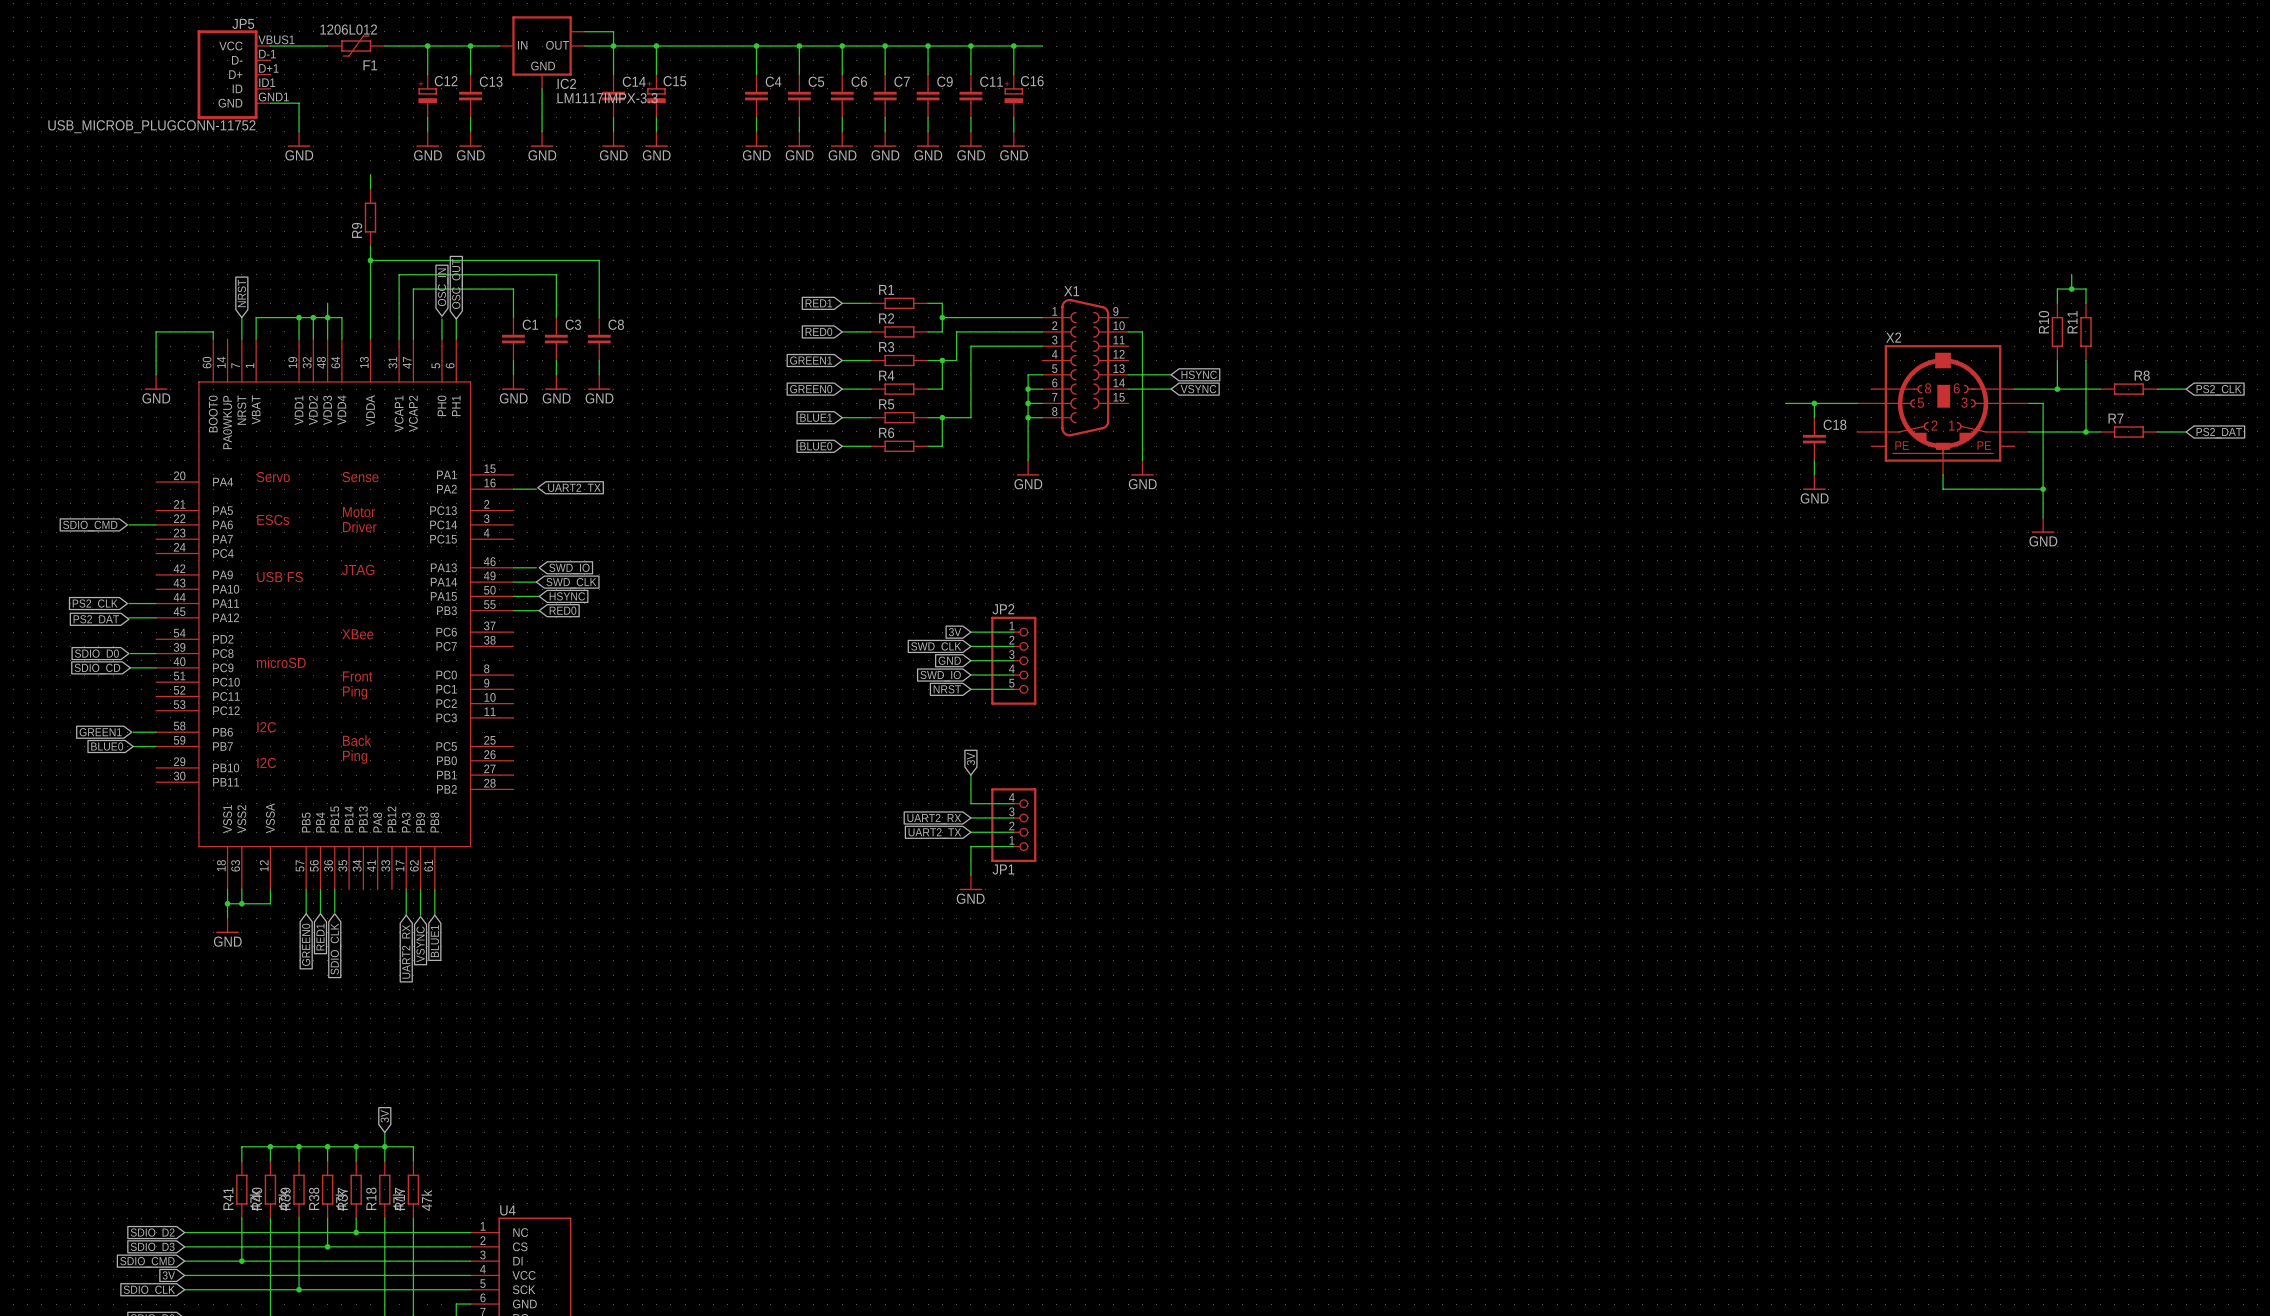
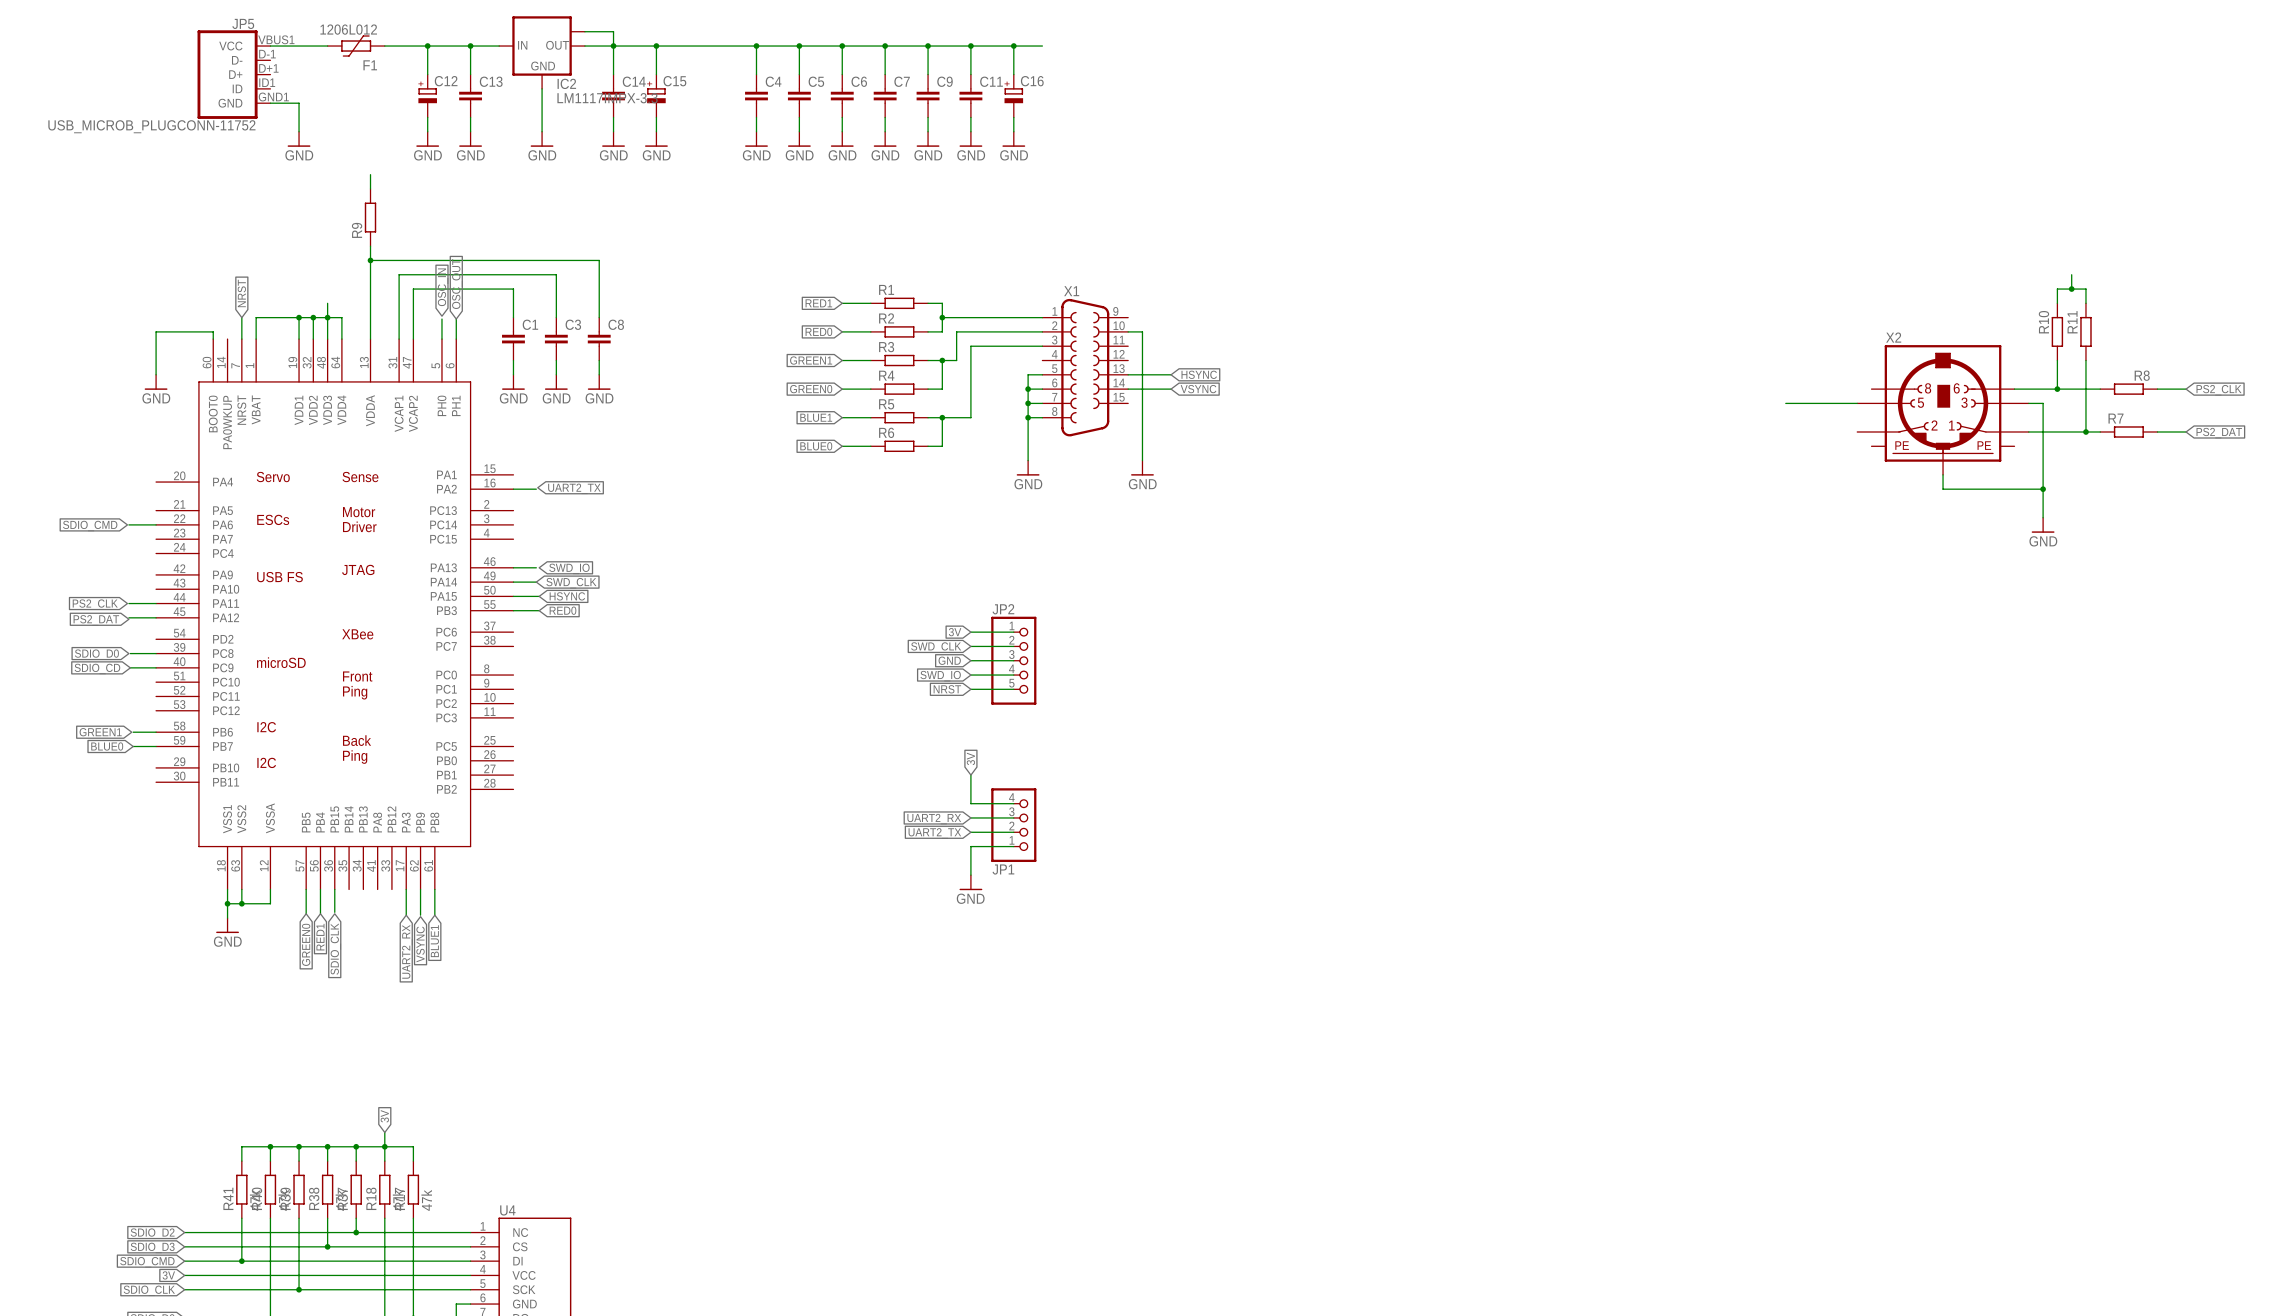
wire: (1814, 403) (1814, 417) -> none
junction: (1814, 403) -> none
C18: (1814, 439) -> none
wire: (1814, 460) (1814, 474) -> none
power symbol: GND (1814, 482) -> none

